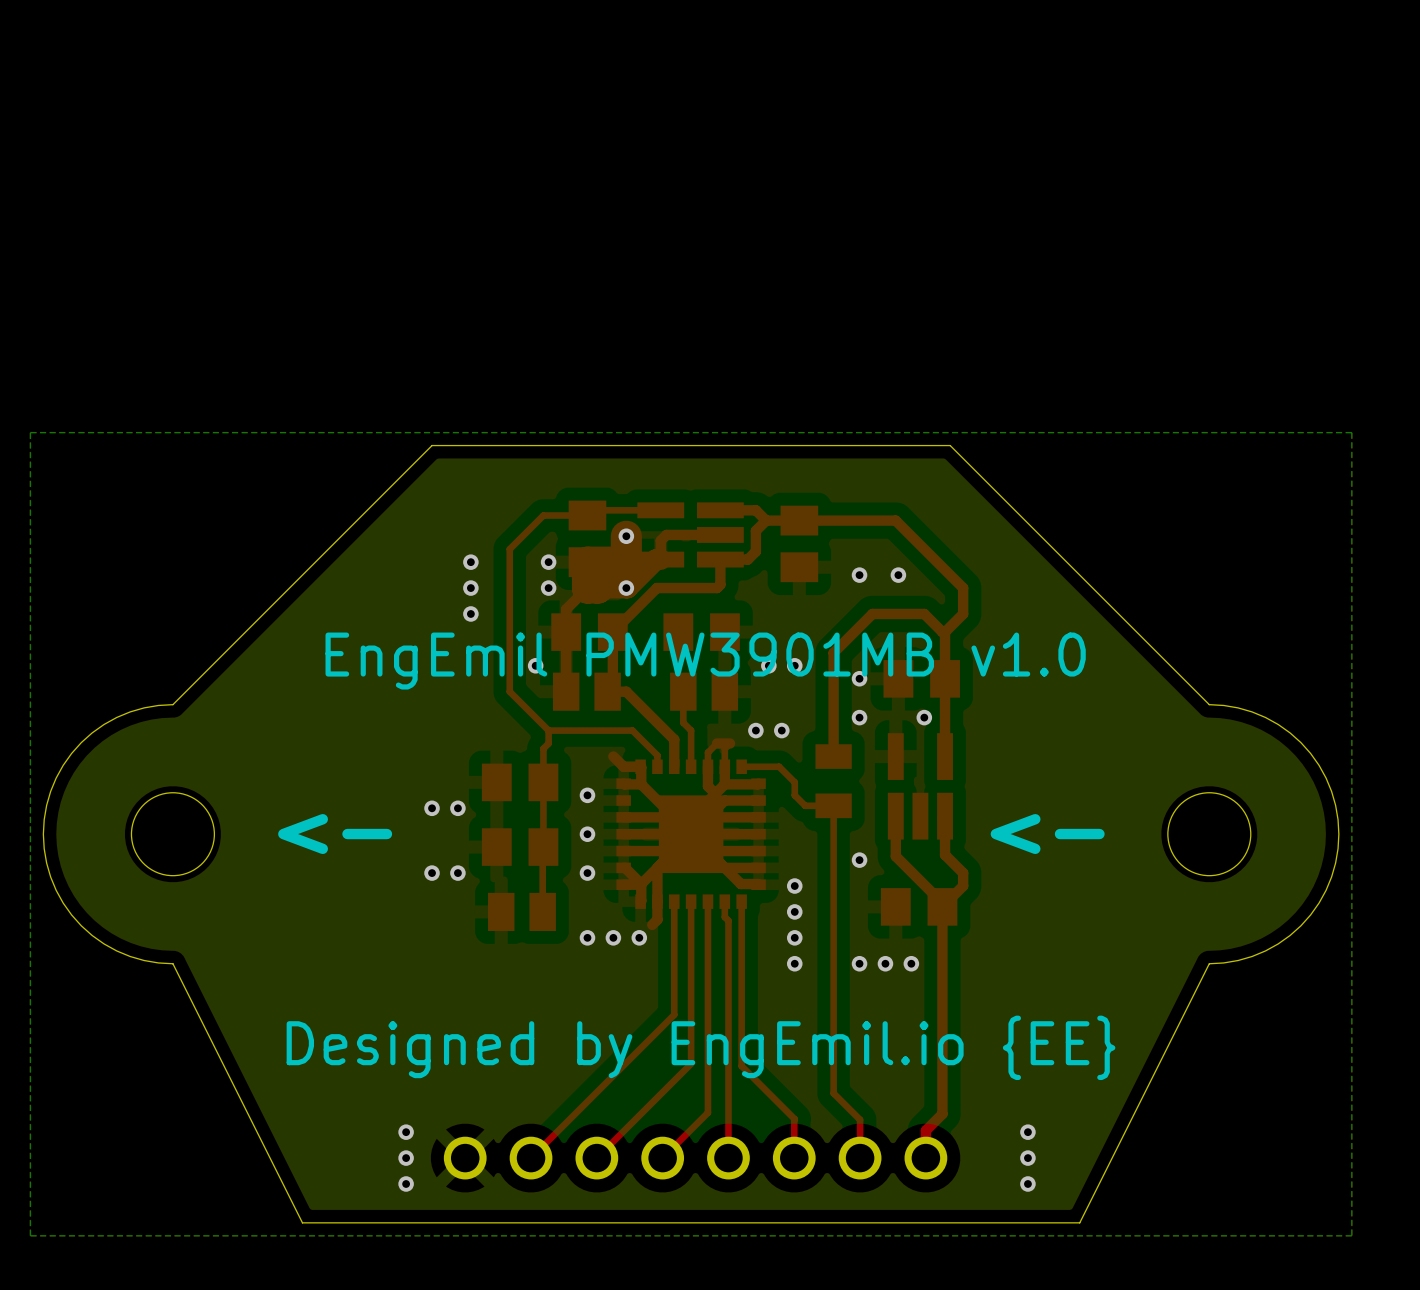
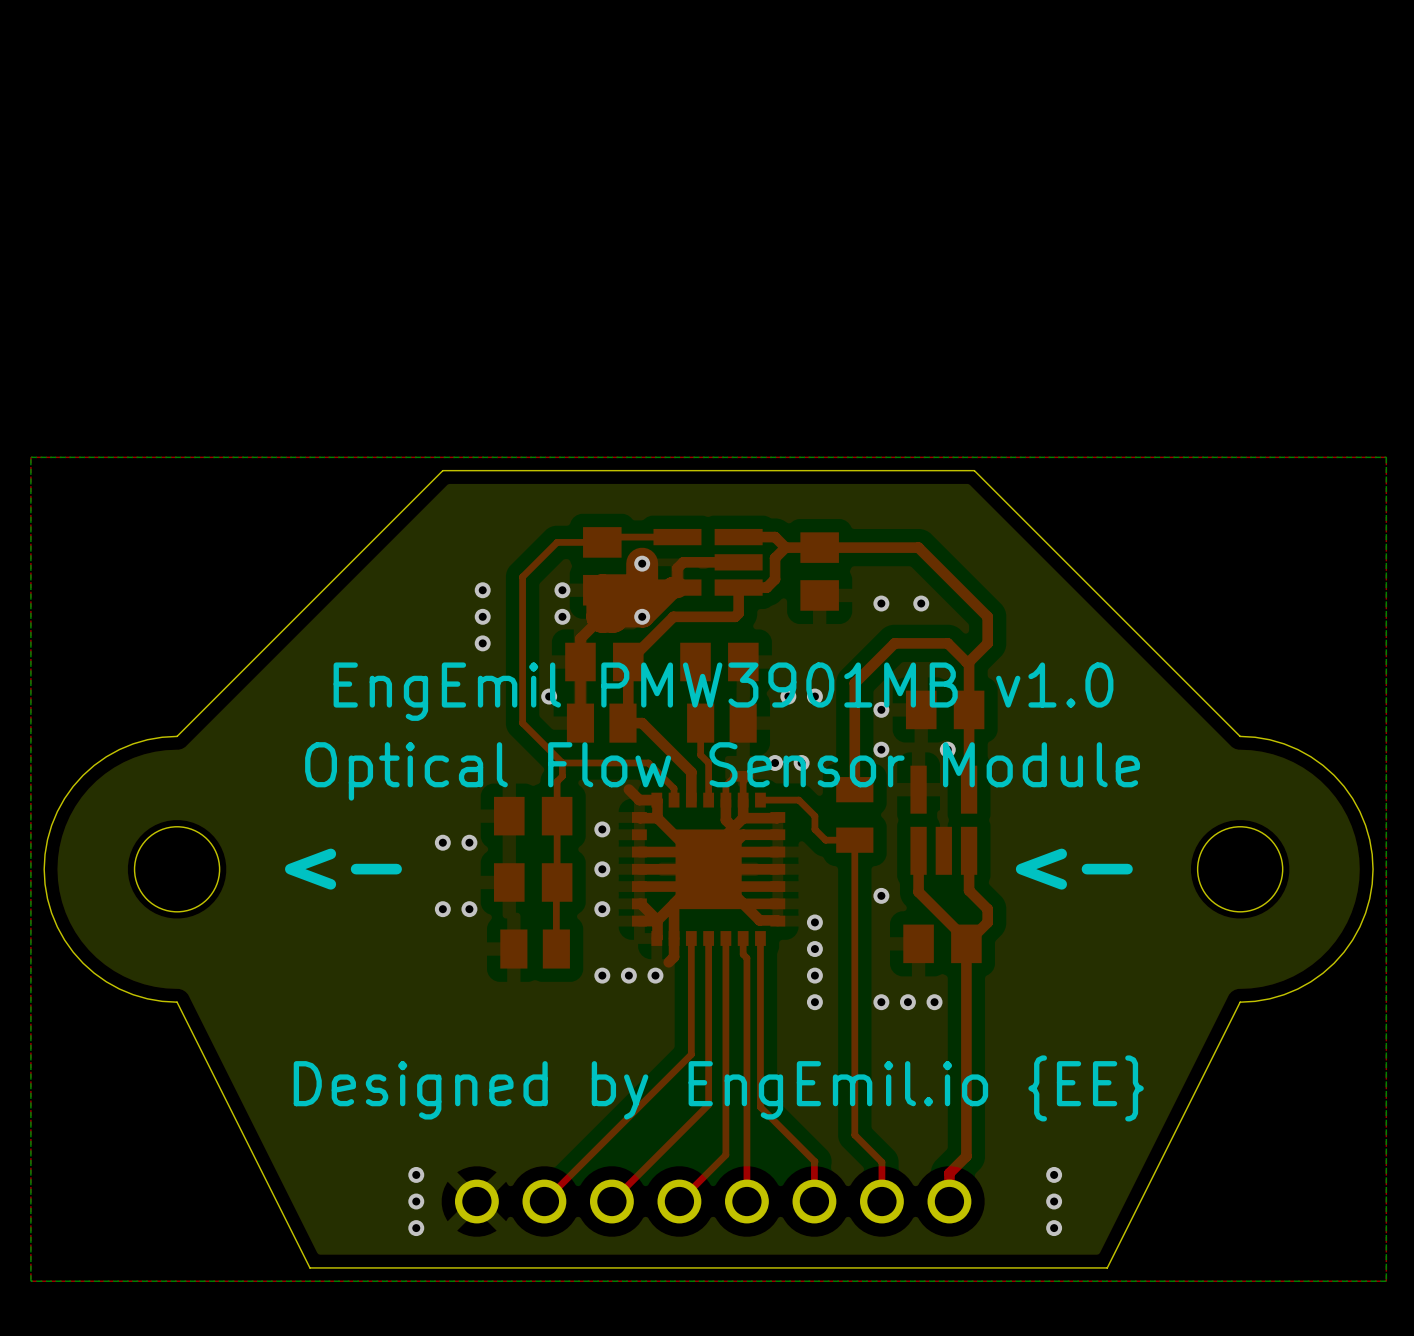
text: none -> Optical Flow Sensor Module (722, 771)

